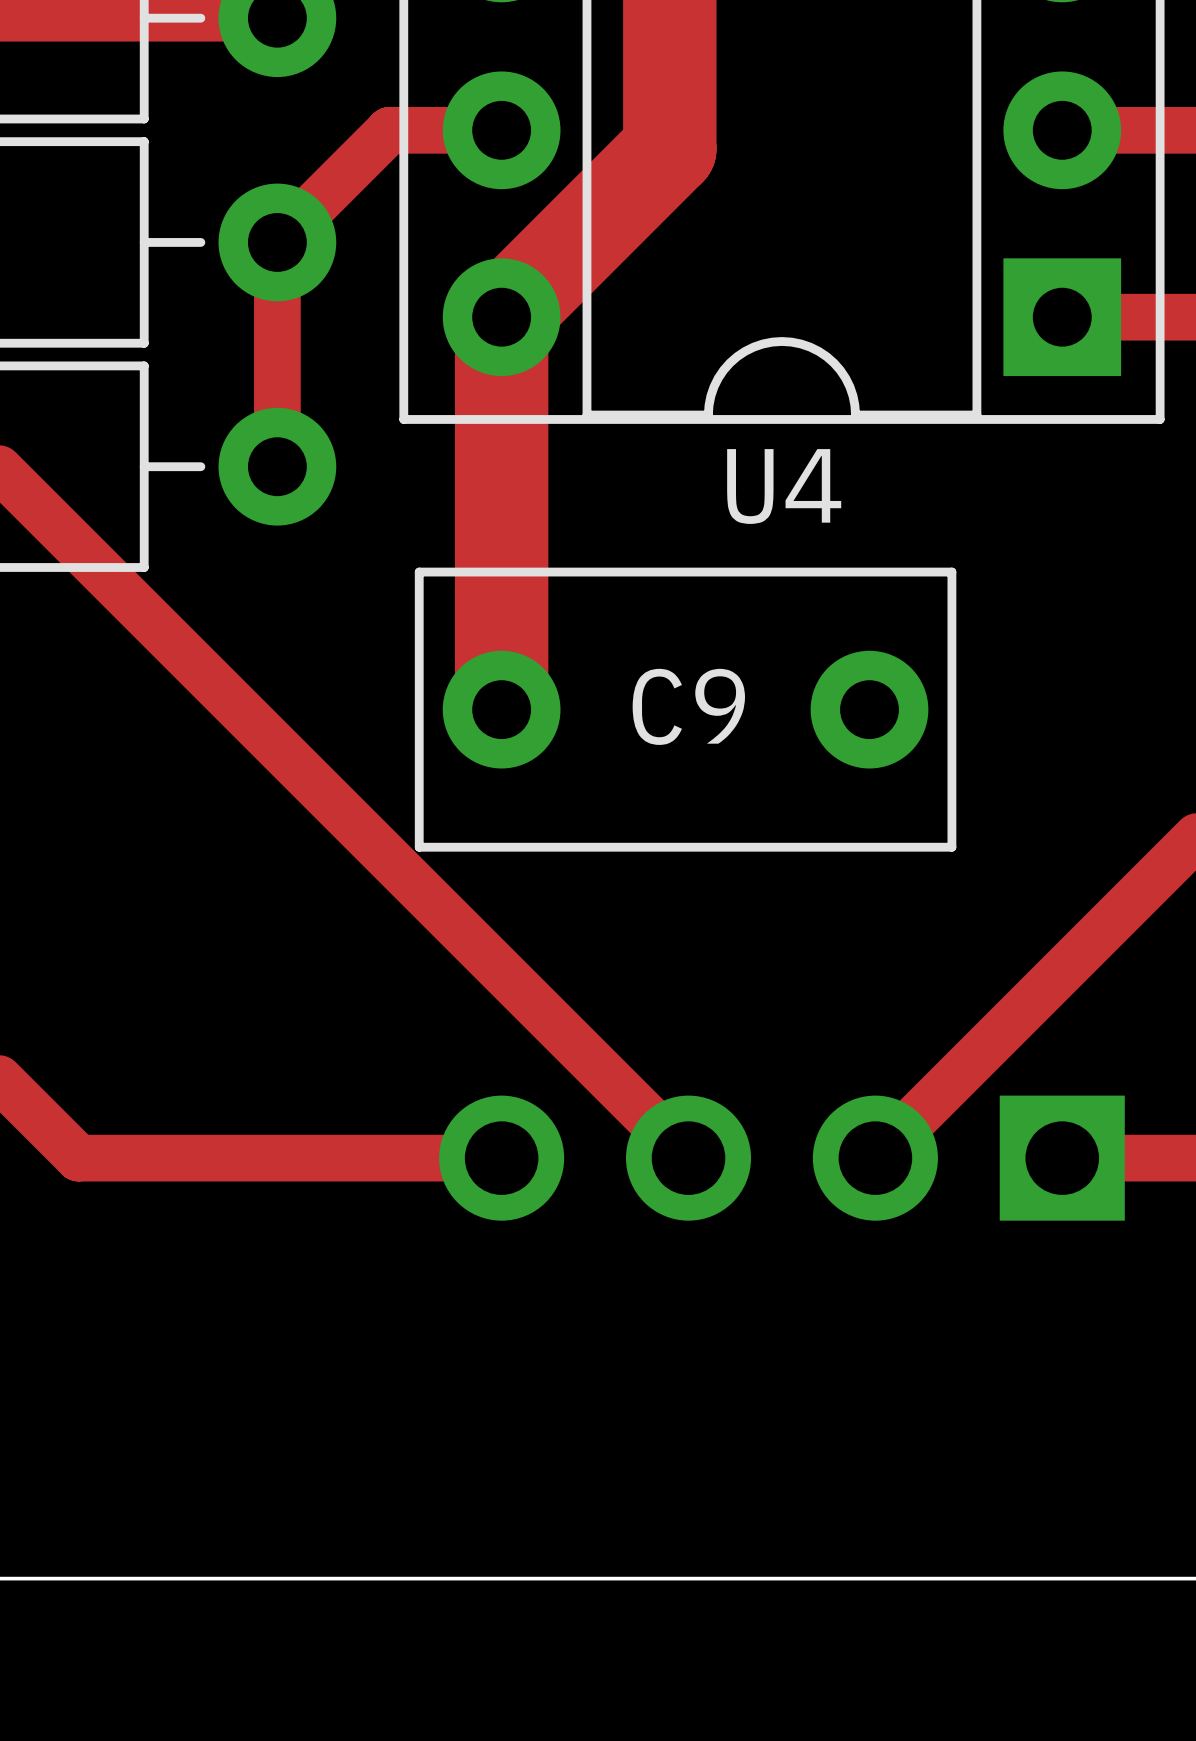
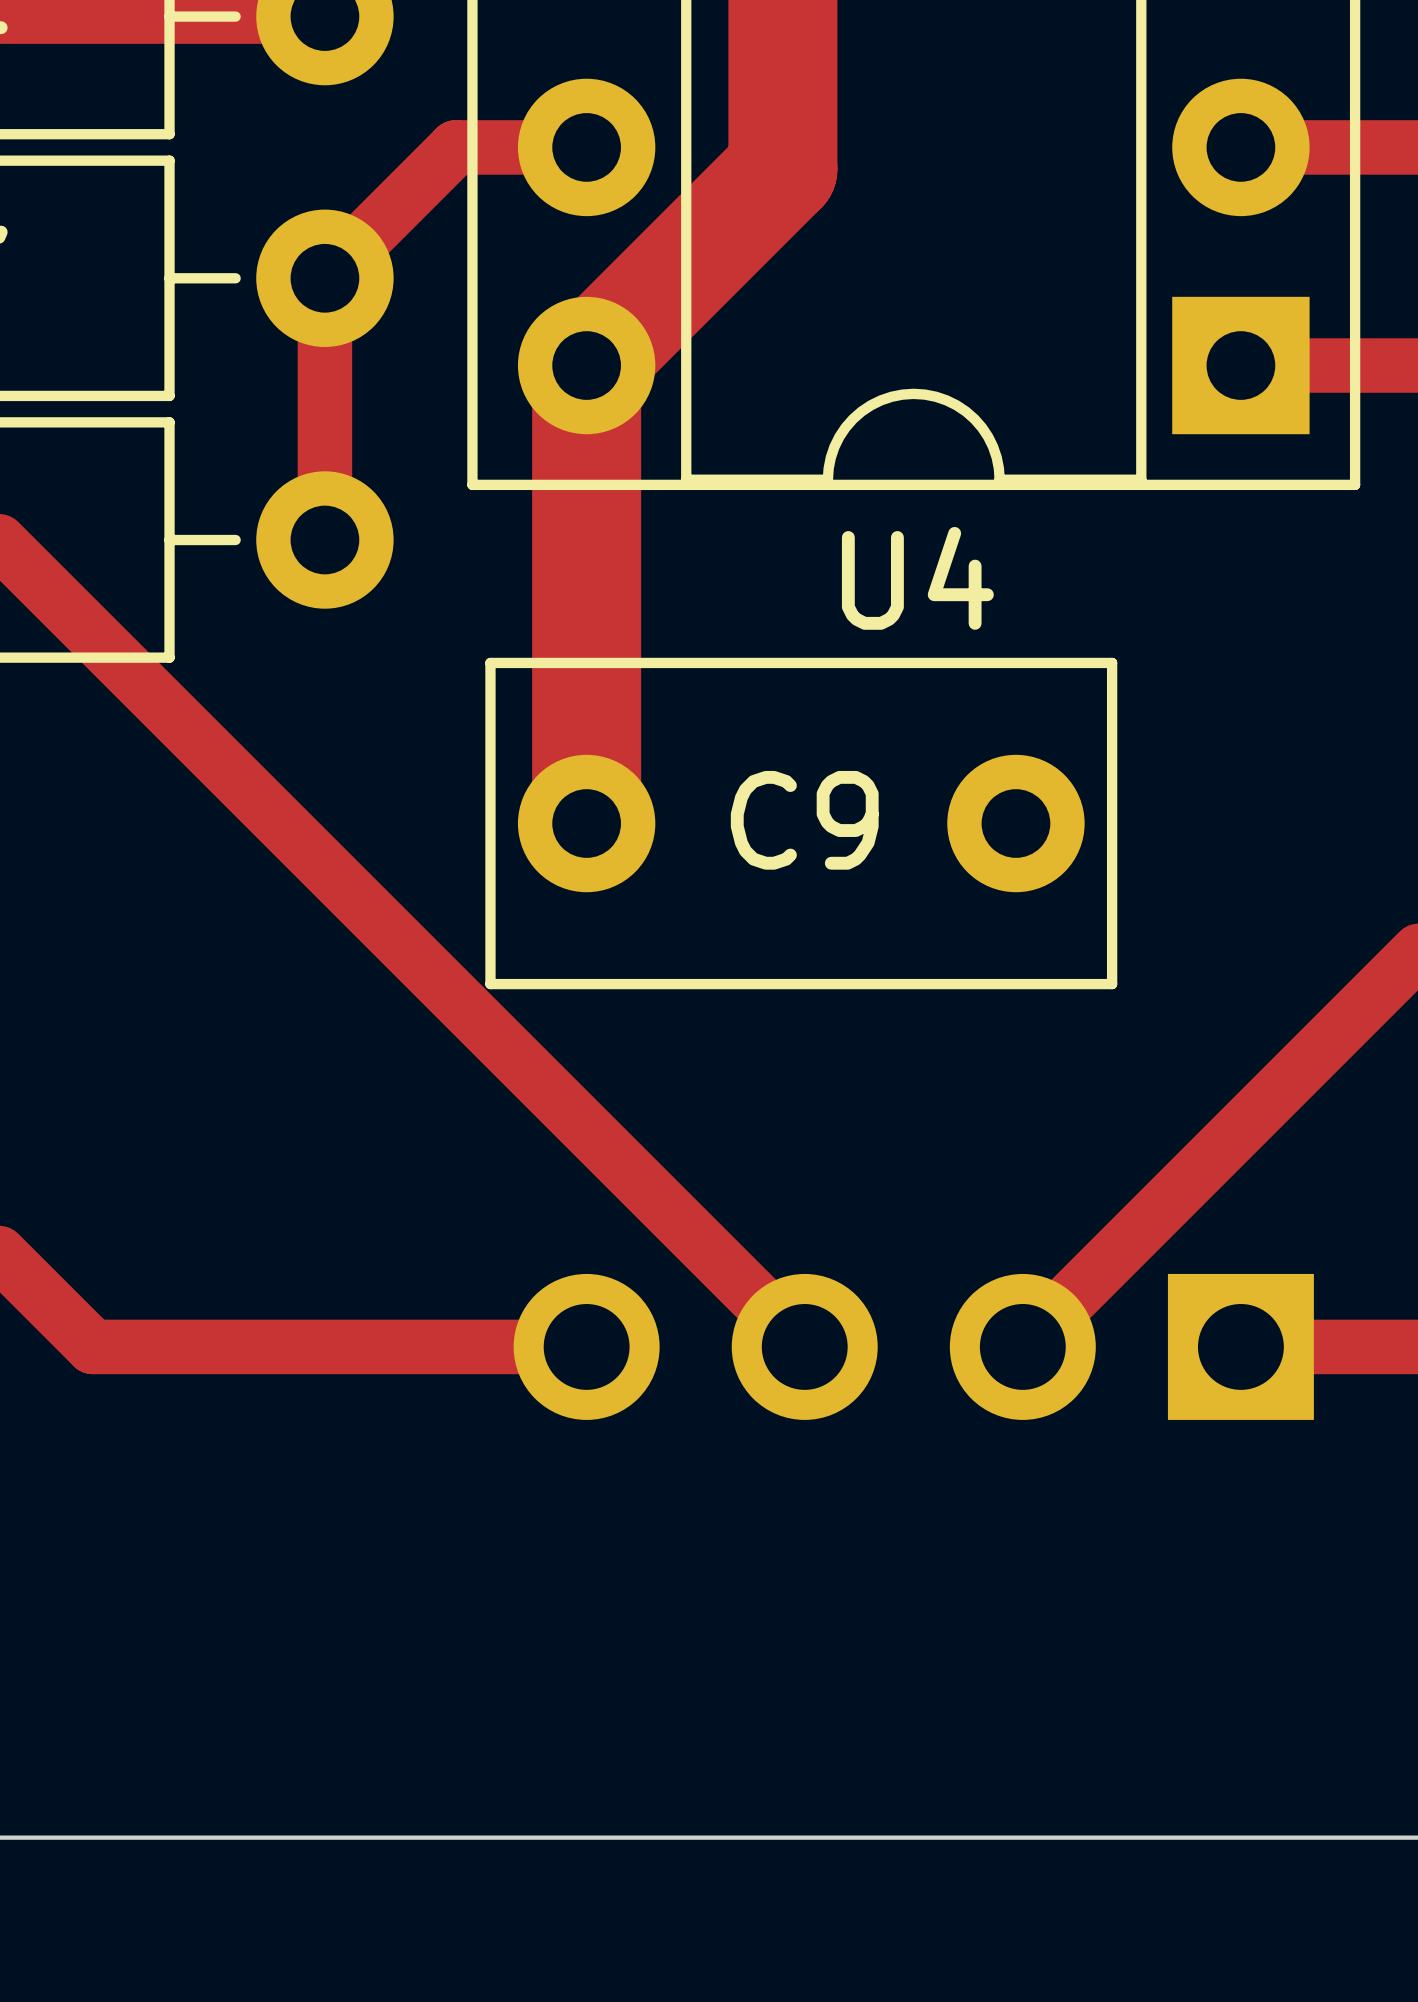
U4 name position: U4 (784, 486) -> U4 (917, 578)

